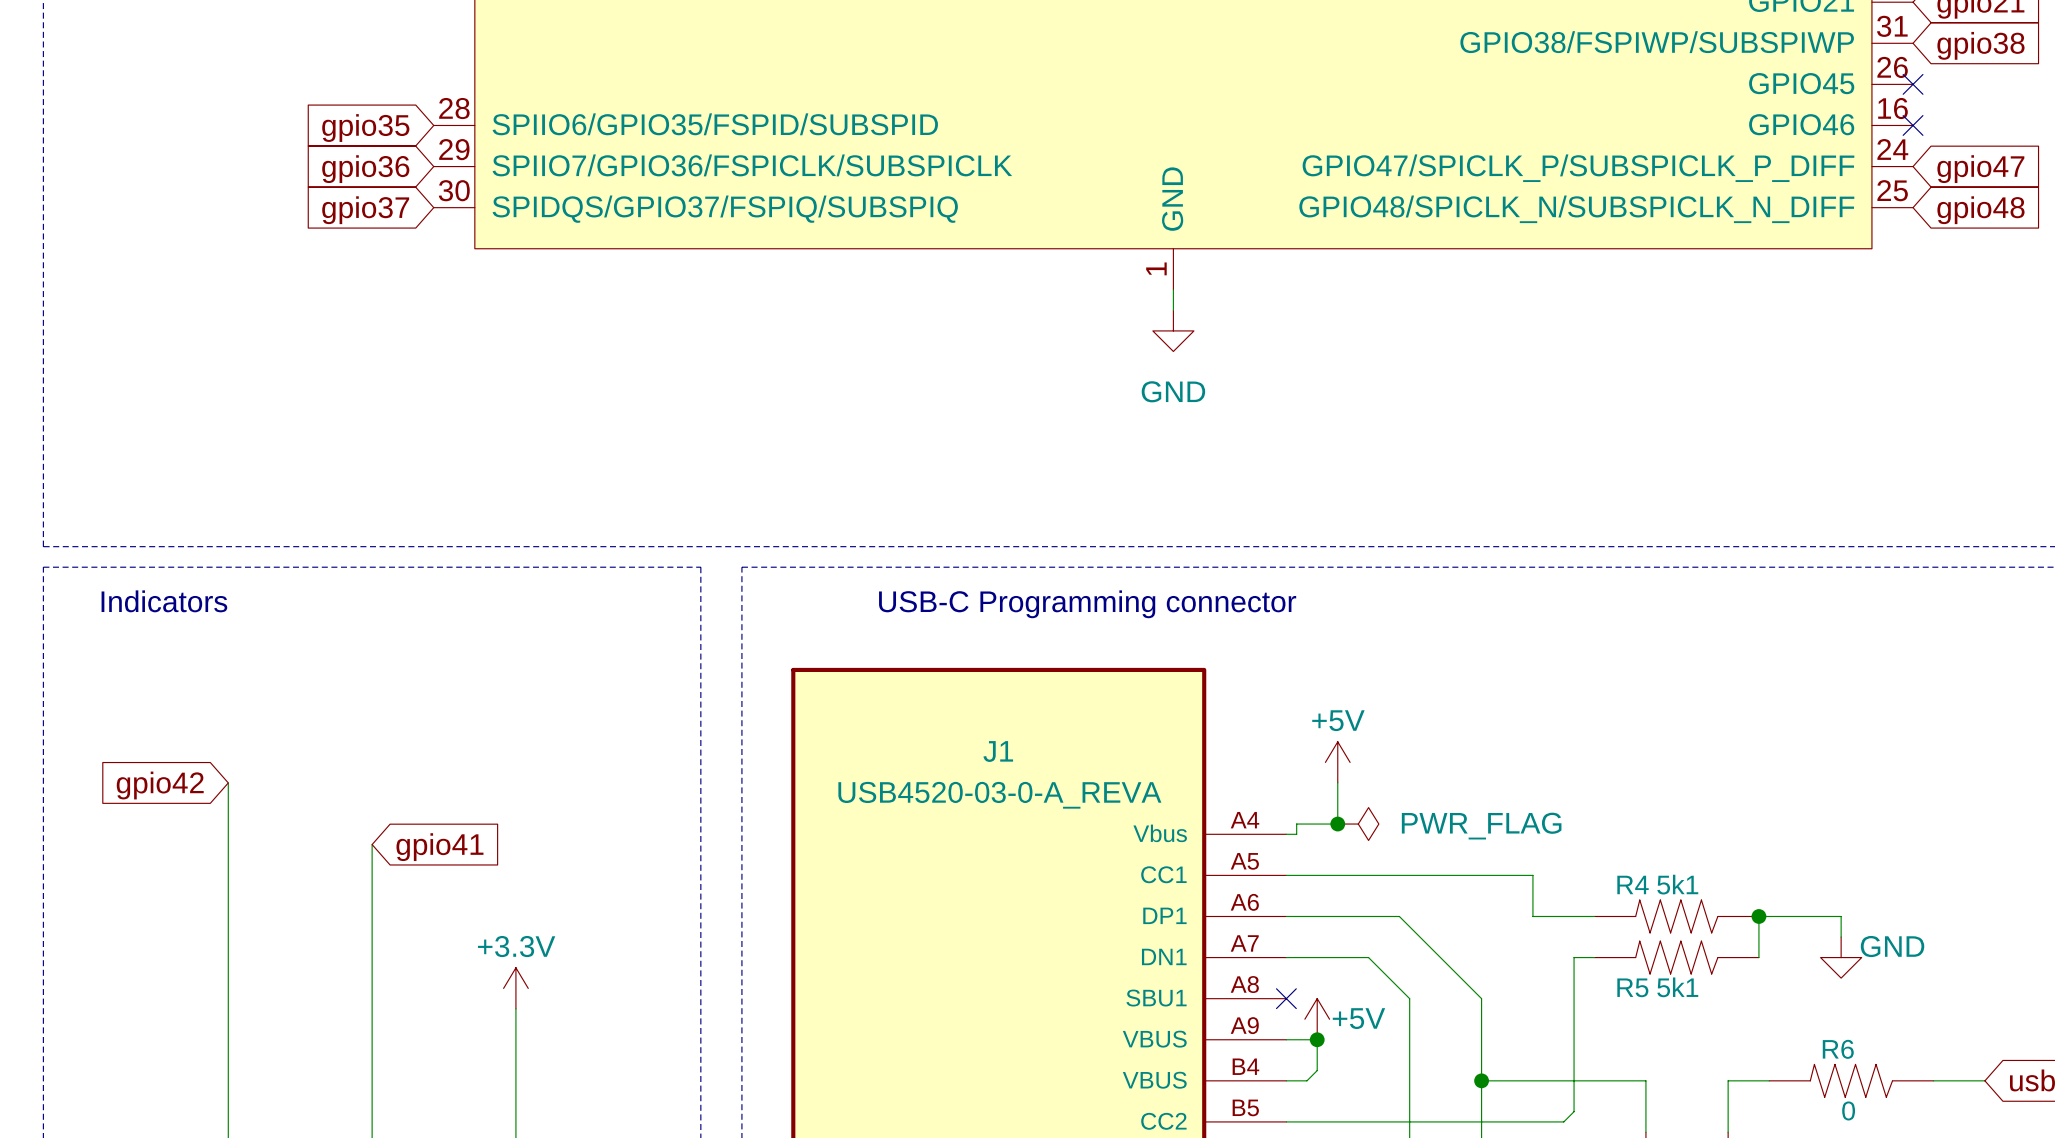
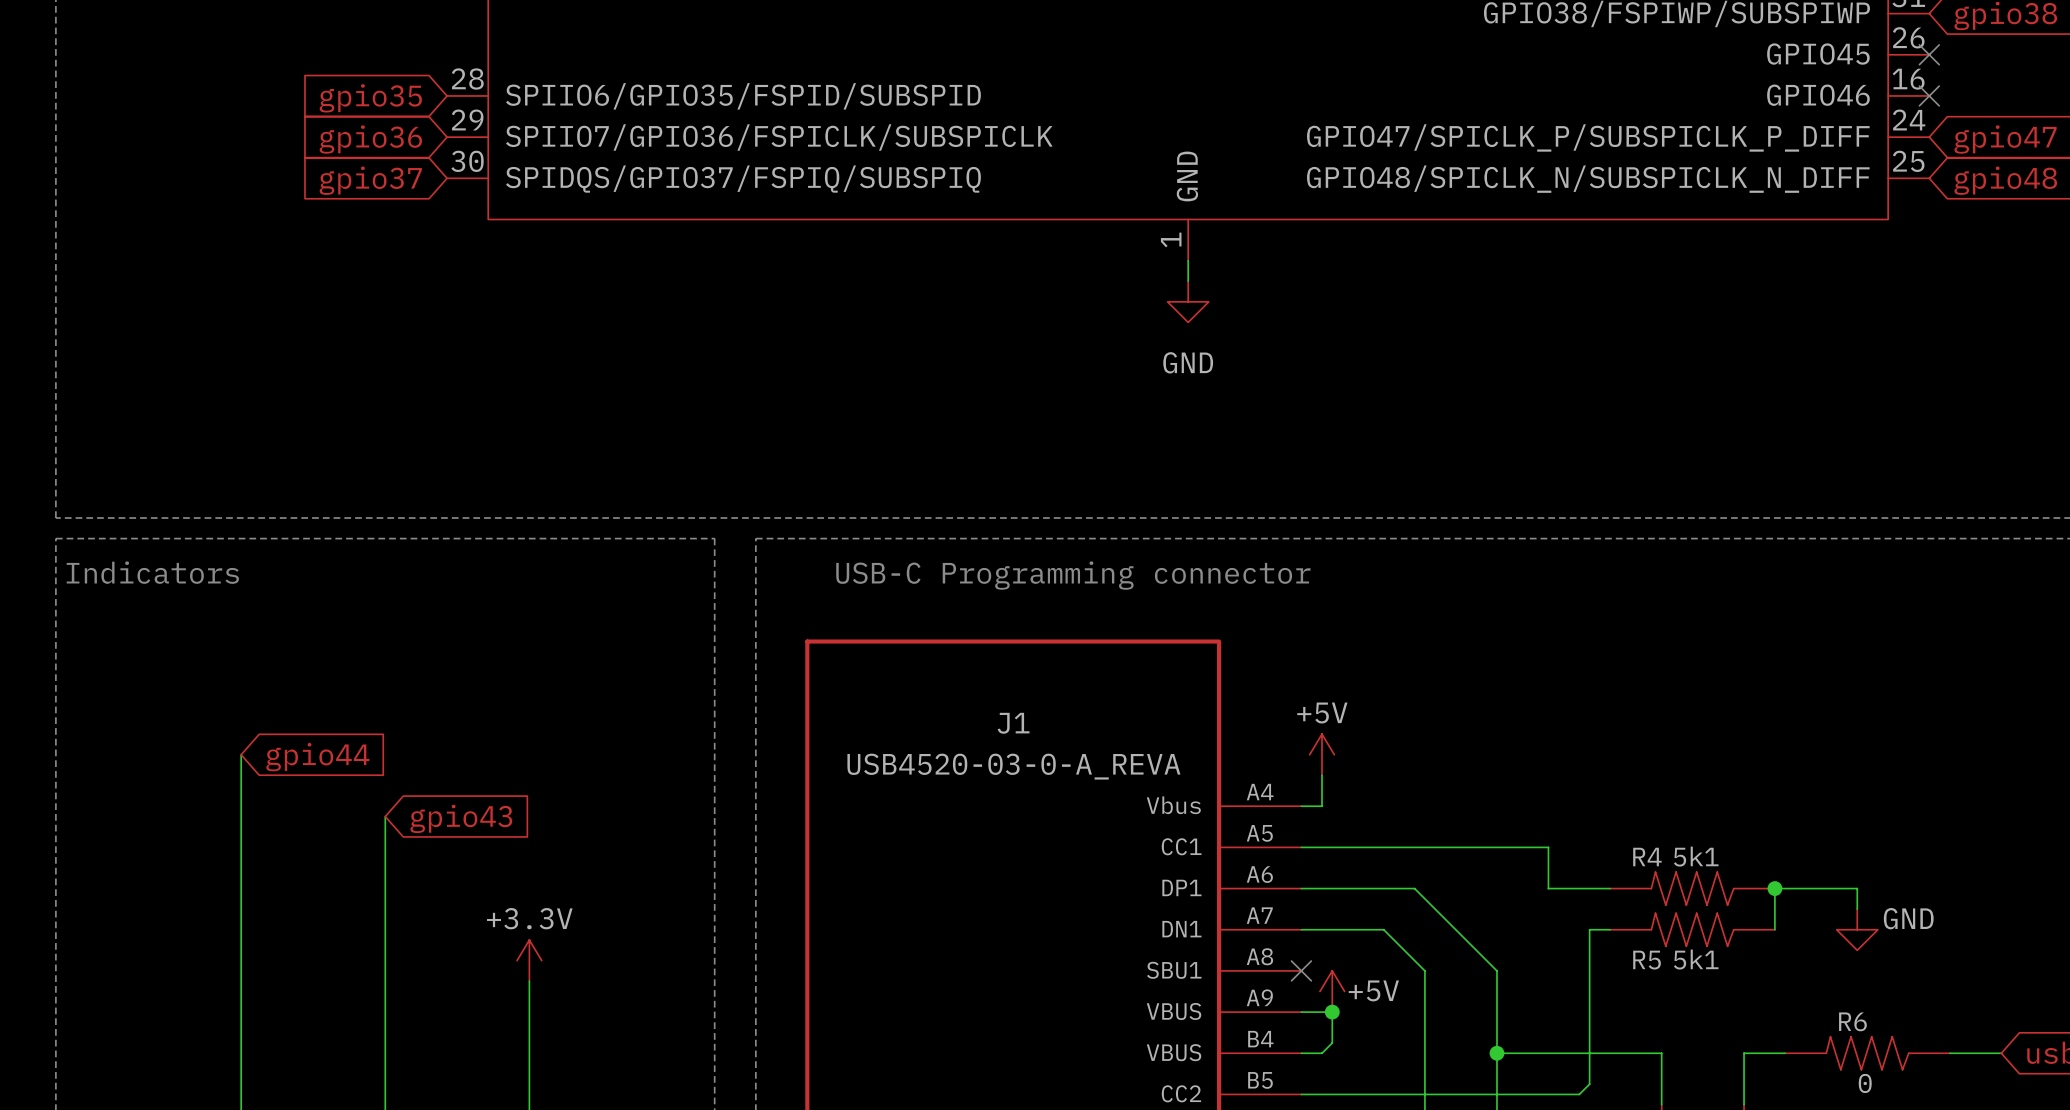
power symbol position: +5V (1337, 762) -> +5V (1322, 754)
wire: (1337, 782) (1337, 824) (1296, 824) (1296, 834) -> (1322, 775) (1322, 806) (1311, 806)
global label: gpio42 (160, 785) -> gpio44 (317, 757)
junction: (1337, 824) -> none
power symbol: PWR_FLAG (1358, 824) -> none
global label: gpio41 (439, 847) -> gpio43 (461, 818)

